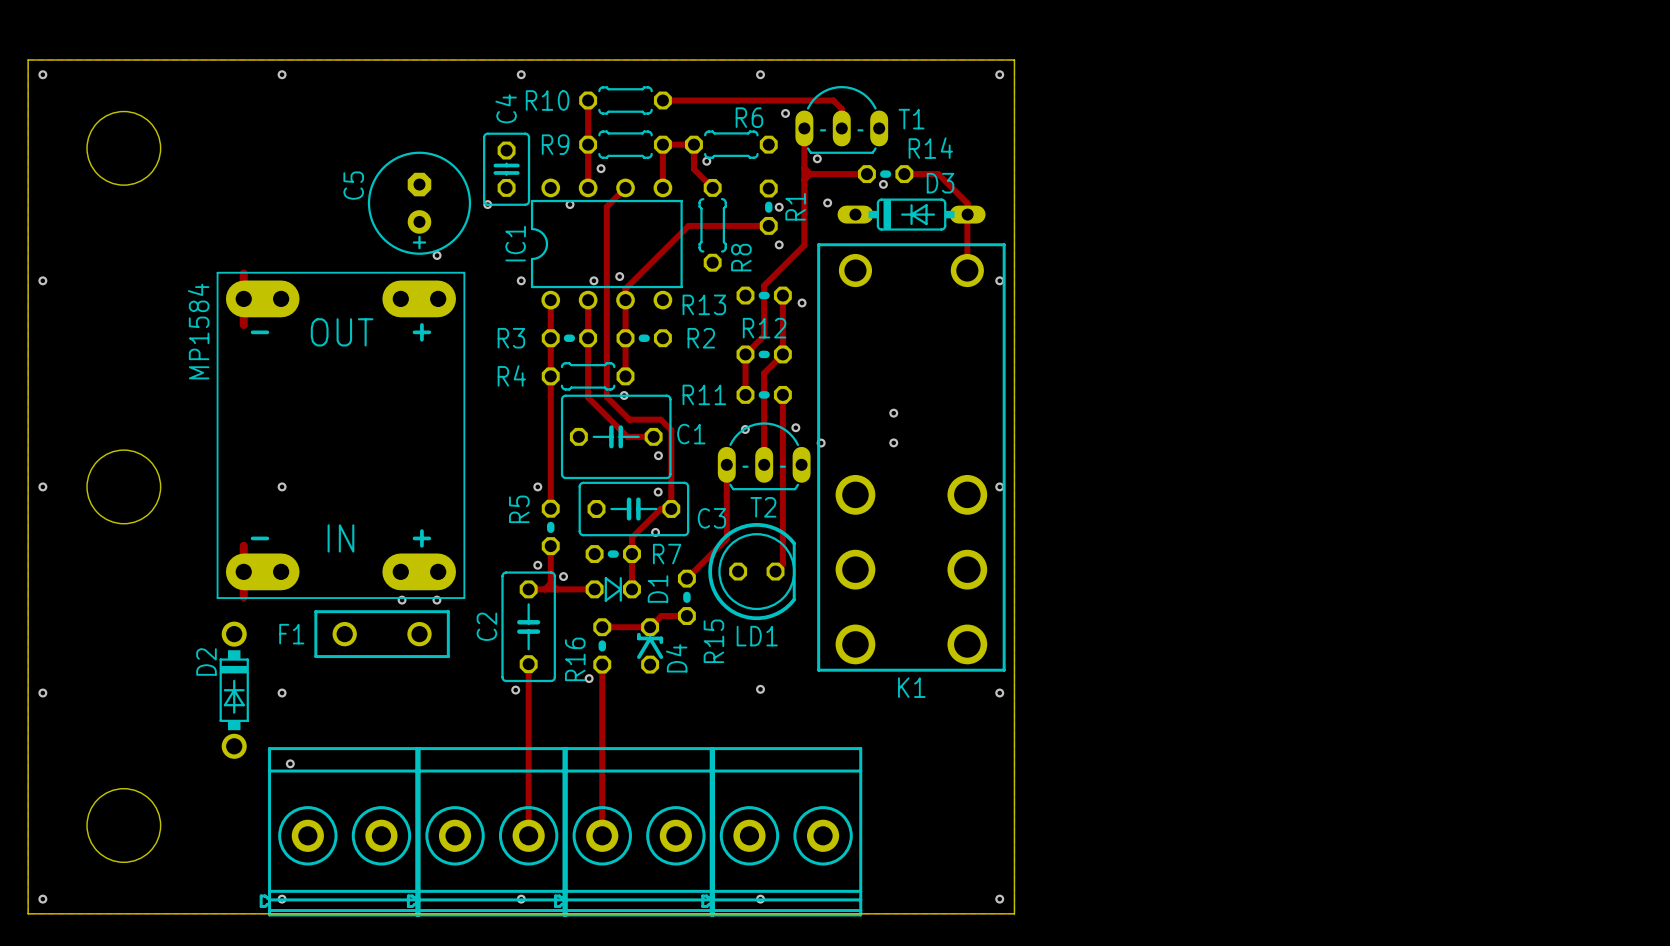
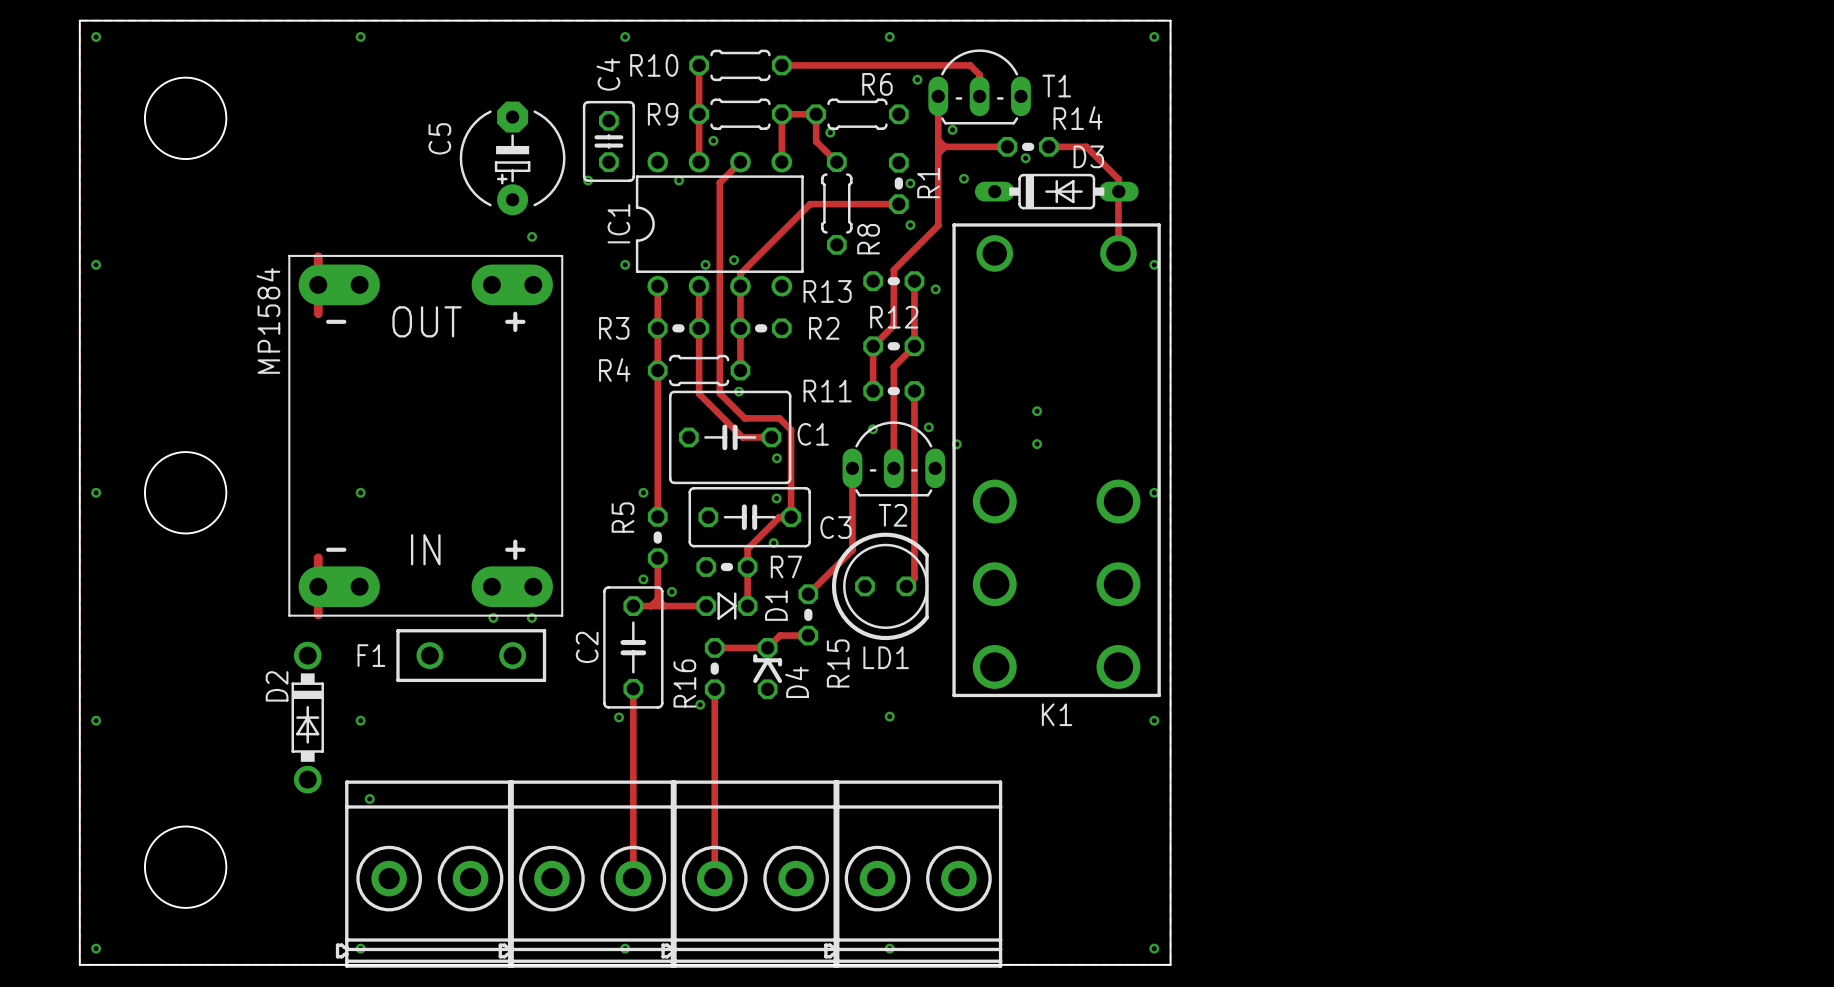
C5 footprint: [367, 151, 472, 255] -> [459, 101, 566, 216]

